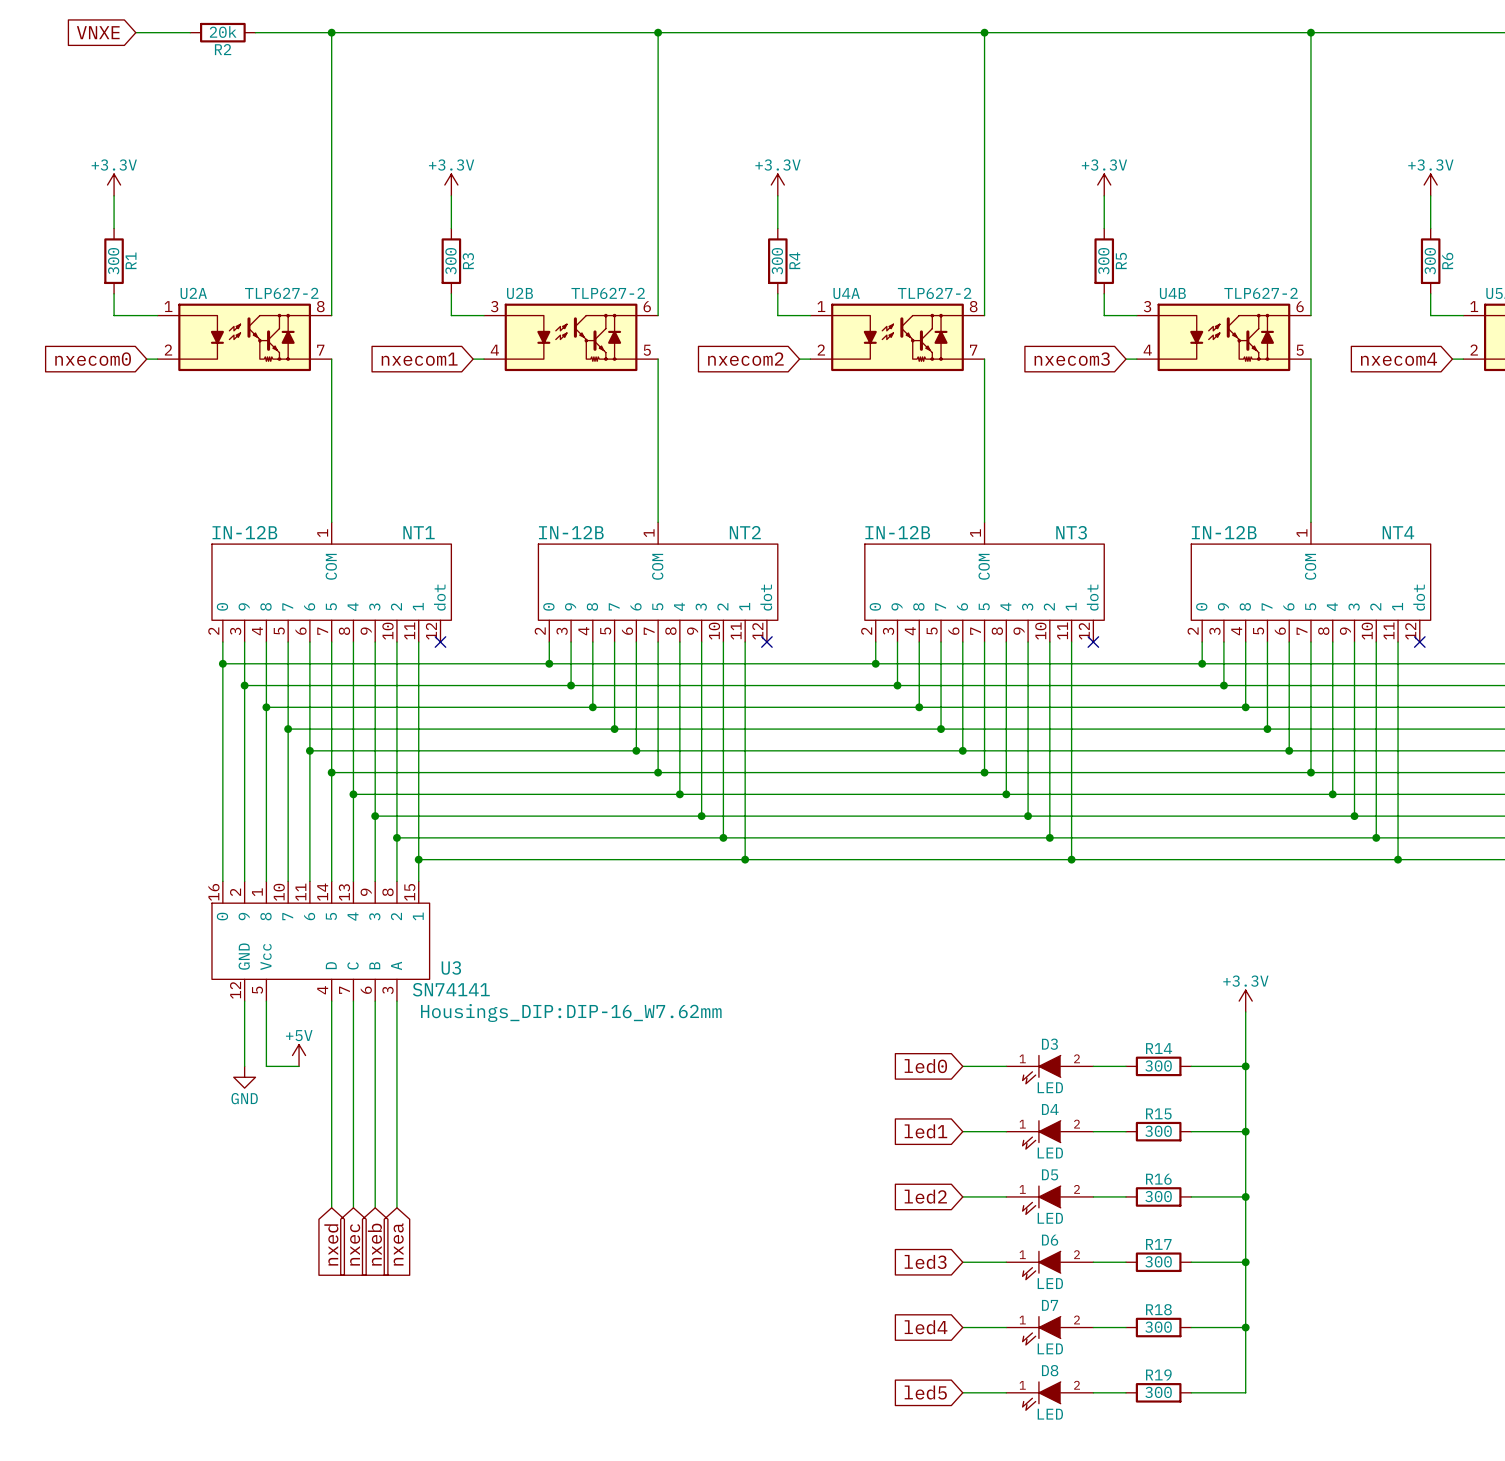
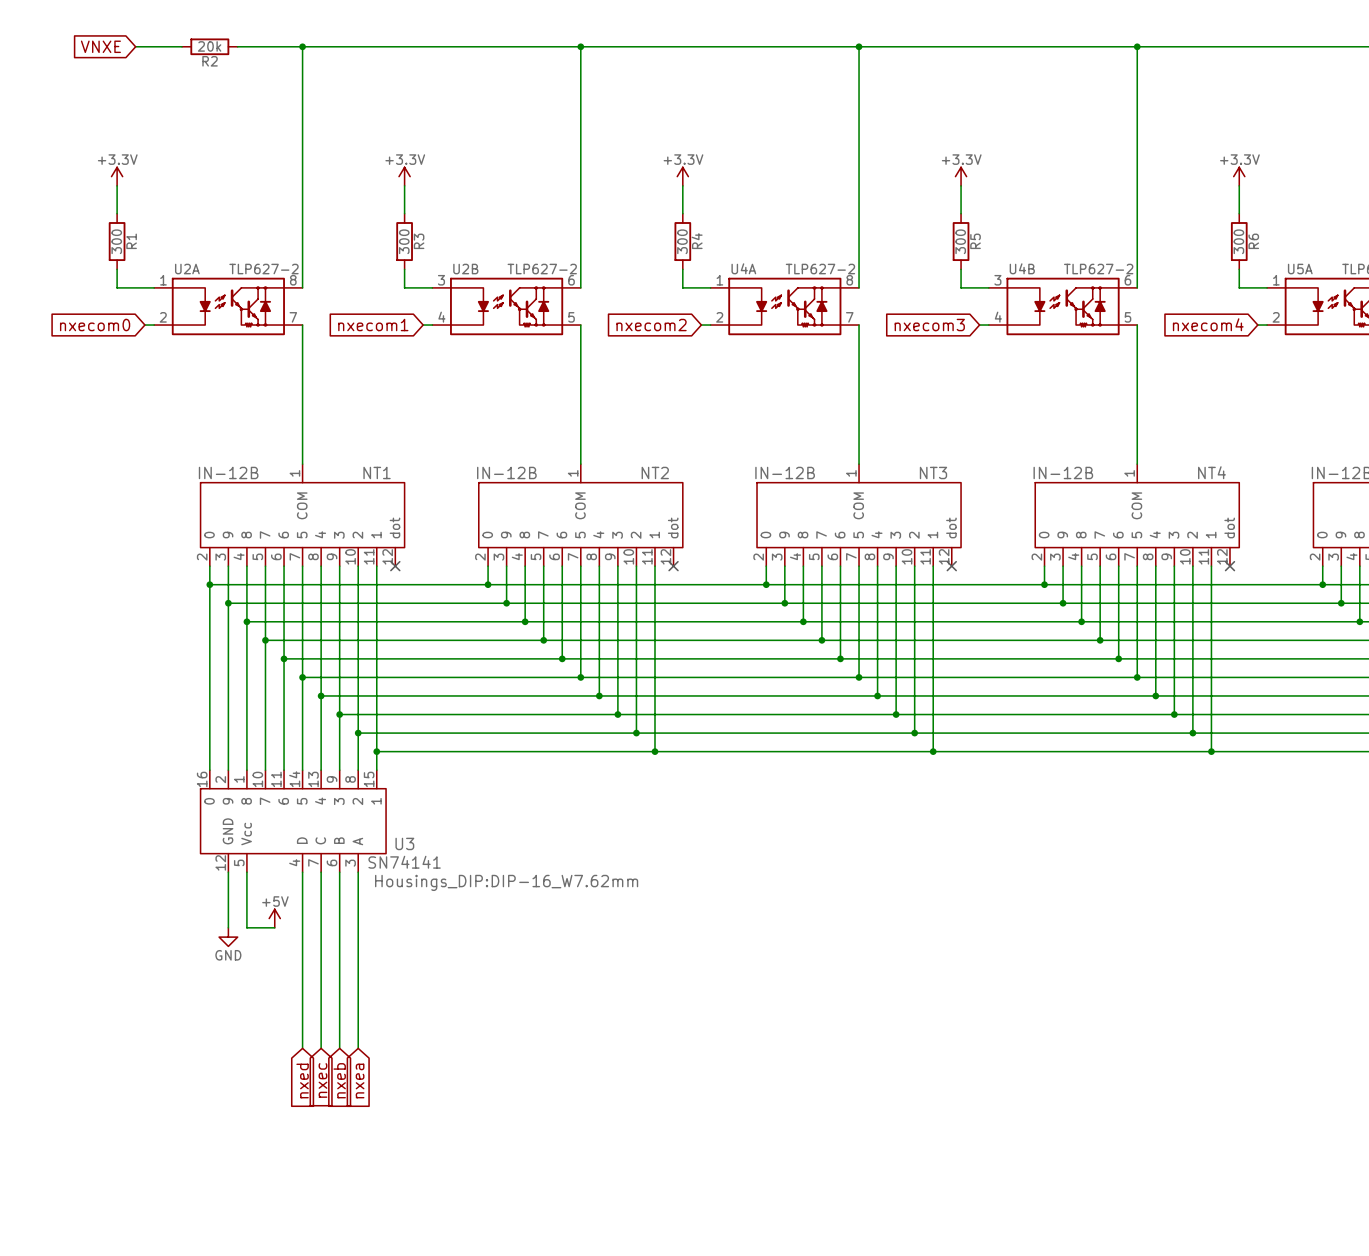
power symbol: +3.3V (1245, 1001) -> none
wire: (1245, 1011) (1245, 1392) (1191, 1392) -> none
global label: led0 (925, 1066) -> none
wire: (962, 1066) (1006, 1066) -> none
wire: (1093, 1066) (1126, 1066) -> none
R14: 300 (1158, 1066) -> none
wire: (1191, 1066) (1245, 1066) -> none
junction: (1245, 1066) -> none
D3: LED (1049, 1069) -> none
global label: led1 (925, 1131) -> none
wire: (962, 1131) (1006, 1131) -> none
wire: (1093, 1131) (1126, 1131) -> none
R15: 300 (1158, 1131) -> none
wire: (1191, 1131) (1245, 1131) -> none
junction: (1245, 1131) -> none
D4: LED (1049, 1134) -> none
global label: led2 (925, 1196) -> none
wire: (962, 1196) (1006, 1196) -> none
wire: (1093, 1196) (1126, 1196) -> none
R16: 300 (1158, 1196) -> none
wire: (1191, 1196) (1245, 1196) -> none
junction: (1245, 1196) -> none
D5: LED (1049, 1200) -> none
global label: led3 (925, 1261) -> none
wire: (962, 1262) (1006, 1262) -> none
wire: (1093, 1262) (1126, 1262) -> none
R17: 300 (1158, 1262) -> none
wire: (1191, 1262) (1245, 1262) -> none
junction: (1245, 1262) -> none
D6: LED (1049, 1265) -> none
global label: led4 (926, 1327) -> none
wire: (962, 1327) (1006, 1327) -> none
wire: (1093, 1327) (1126, 1327) -> none
R18: 300 (1158, 1327) -> none
wire: (1191, 1327) (1245, 1327) -> none
junction: (1245, 1327) -> none
D7: LED (1049, 1330) -> none
global label: led5 (925, 1392) -> none
wire: (962, 1392) (1006, 1392) -> none
wire: (1093, 1392) (1126, 1392) -> none
R19: 300 (1158, 1392) -> none
D8: LED (1049, 1396) -> none

